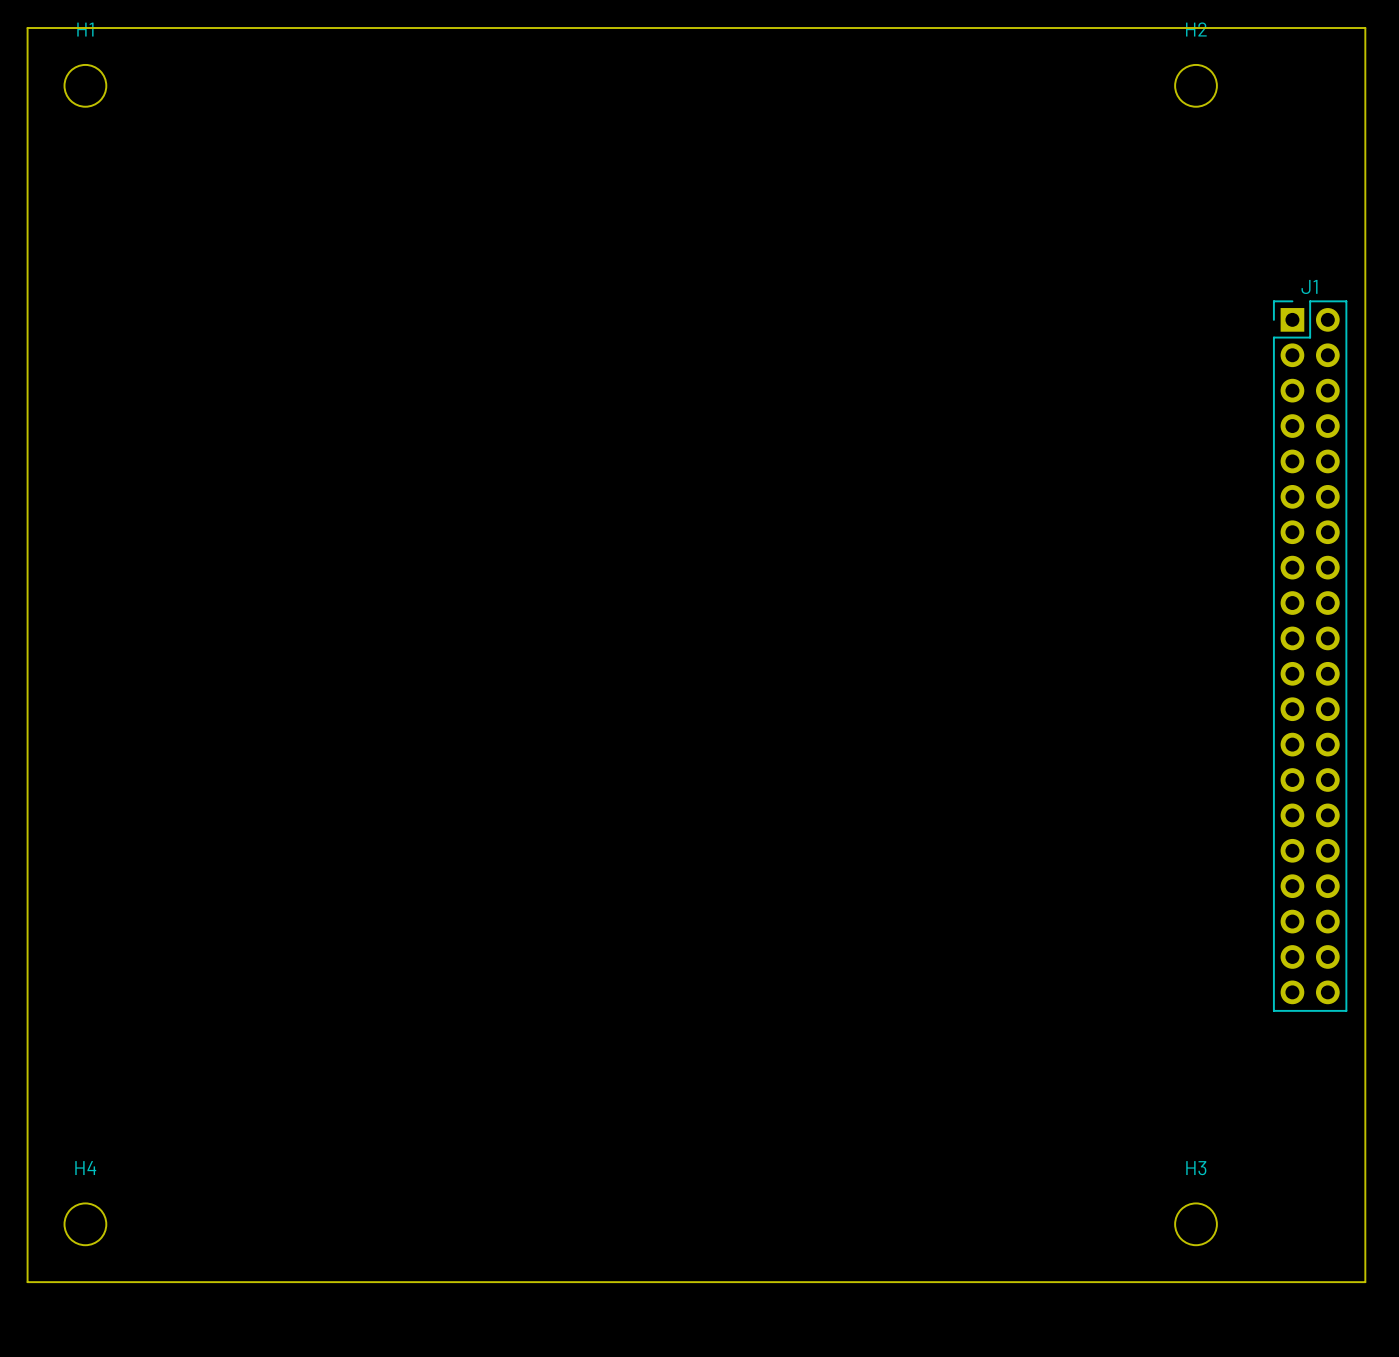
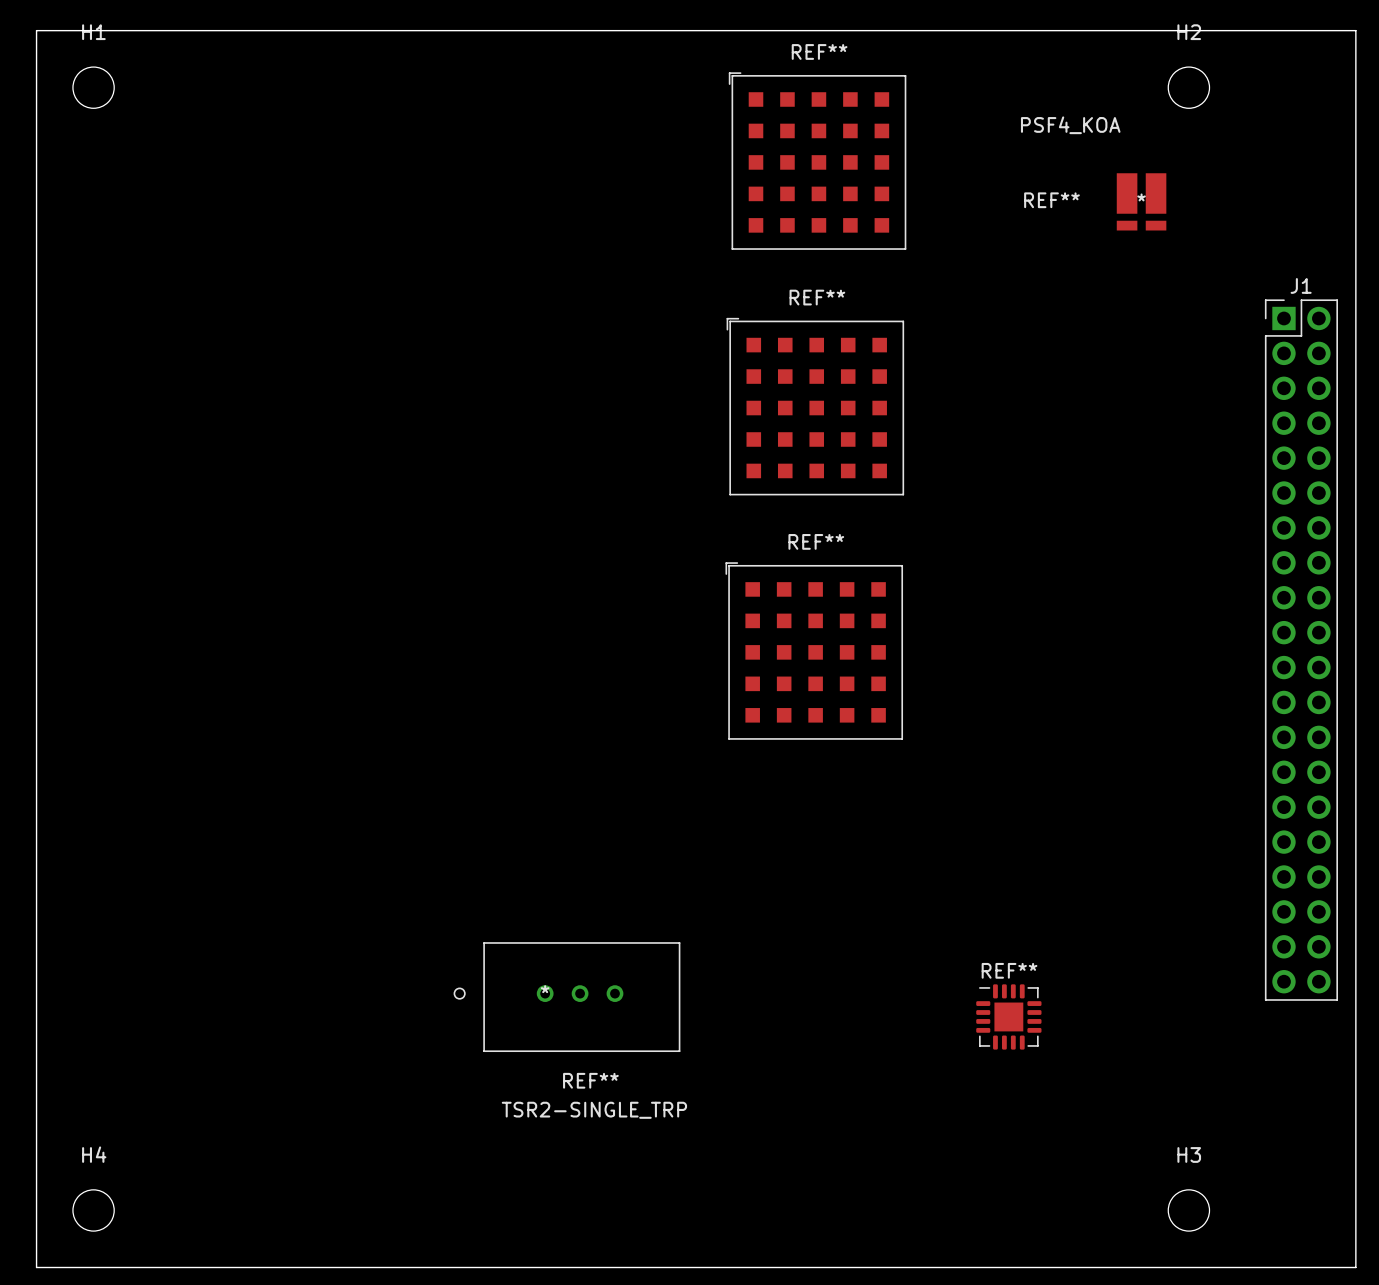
REF**: none -> (817, 161)
REF**: none -> PSF4_KOA (1141, 201)
REF**: none -> (815, 406)
REF**: none -> (814, 650)
REF**: none -> TSR2-SINGLE_TRP (566, 997)
REF**: none -> (1008, 1016)

